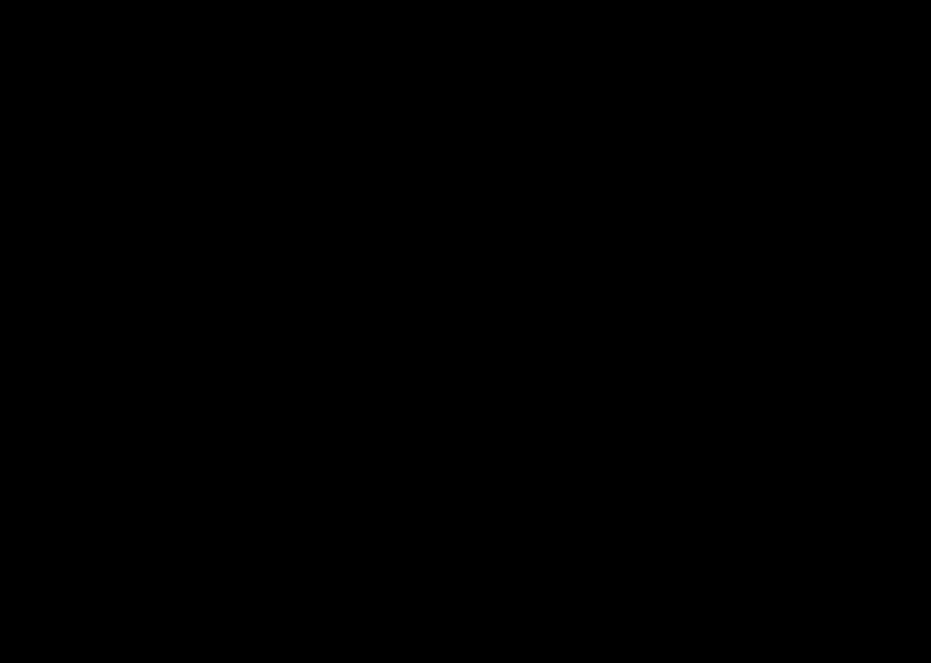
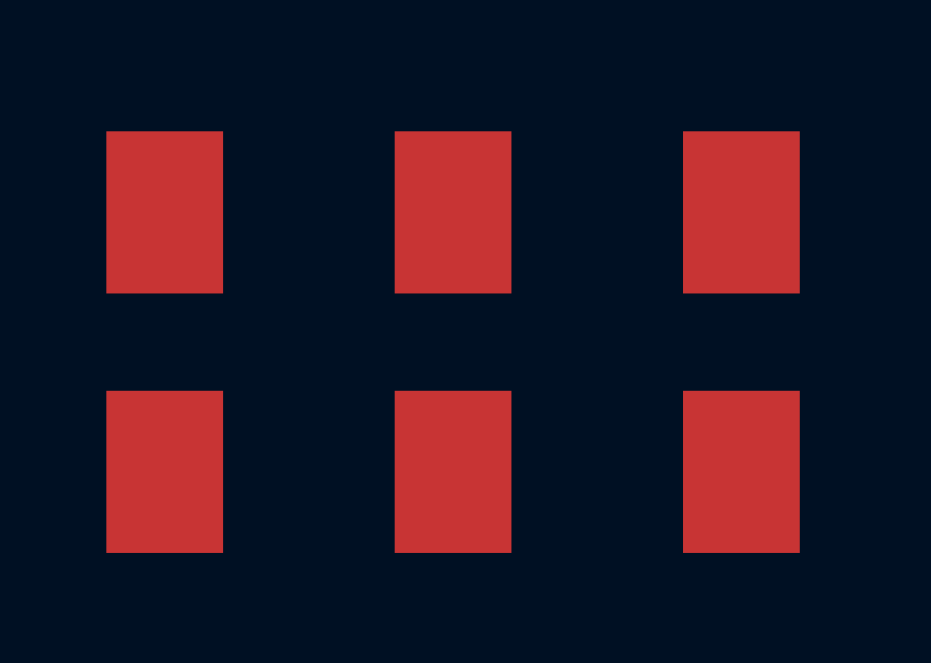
part: none -> (164, 342)
part: none -> (453, 342)
part: none -> (741, 342)

